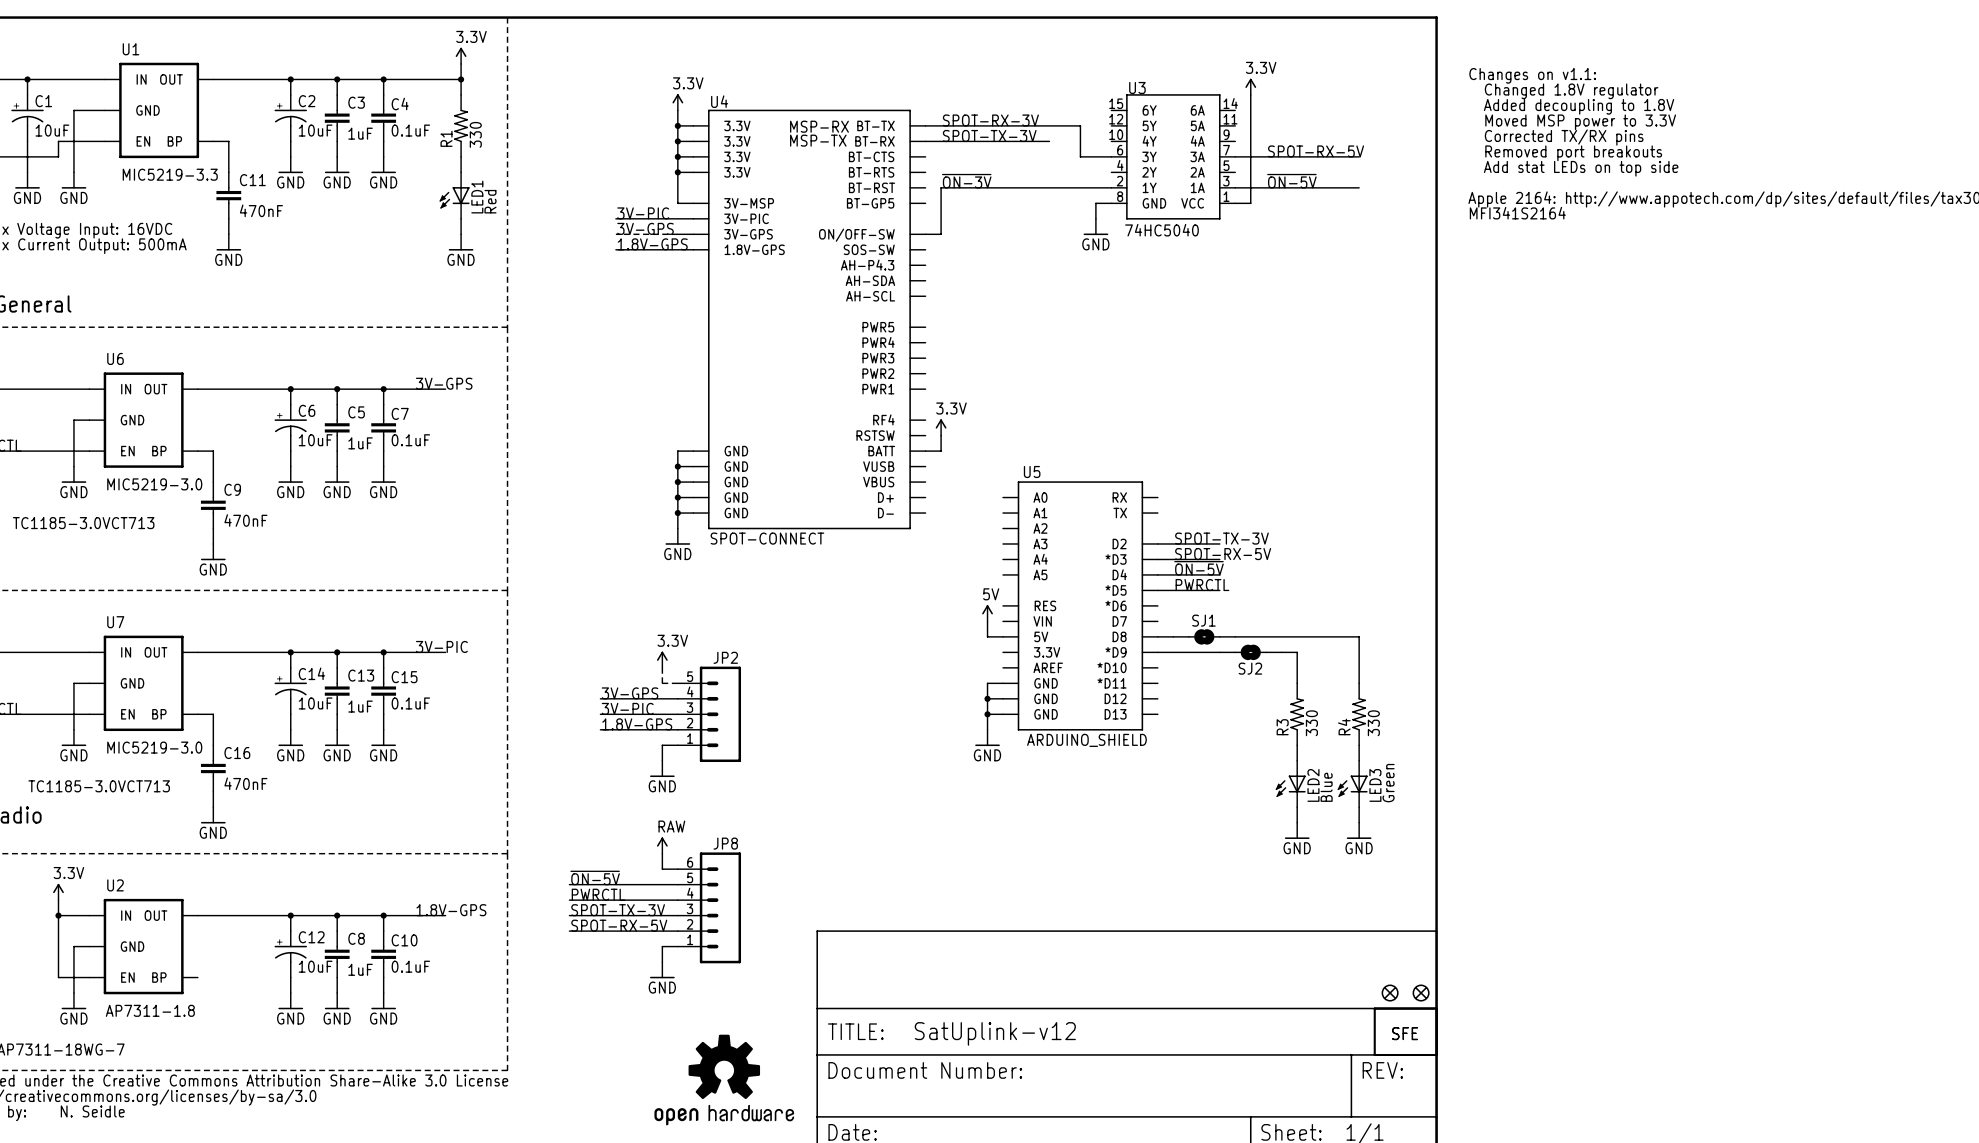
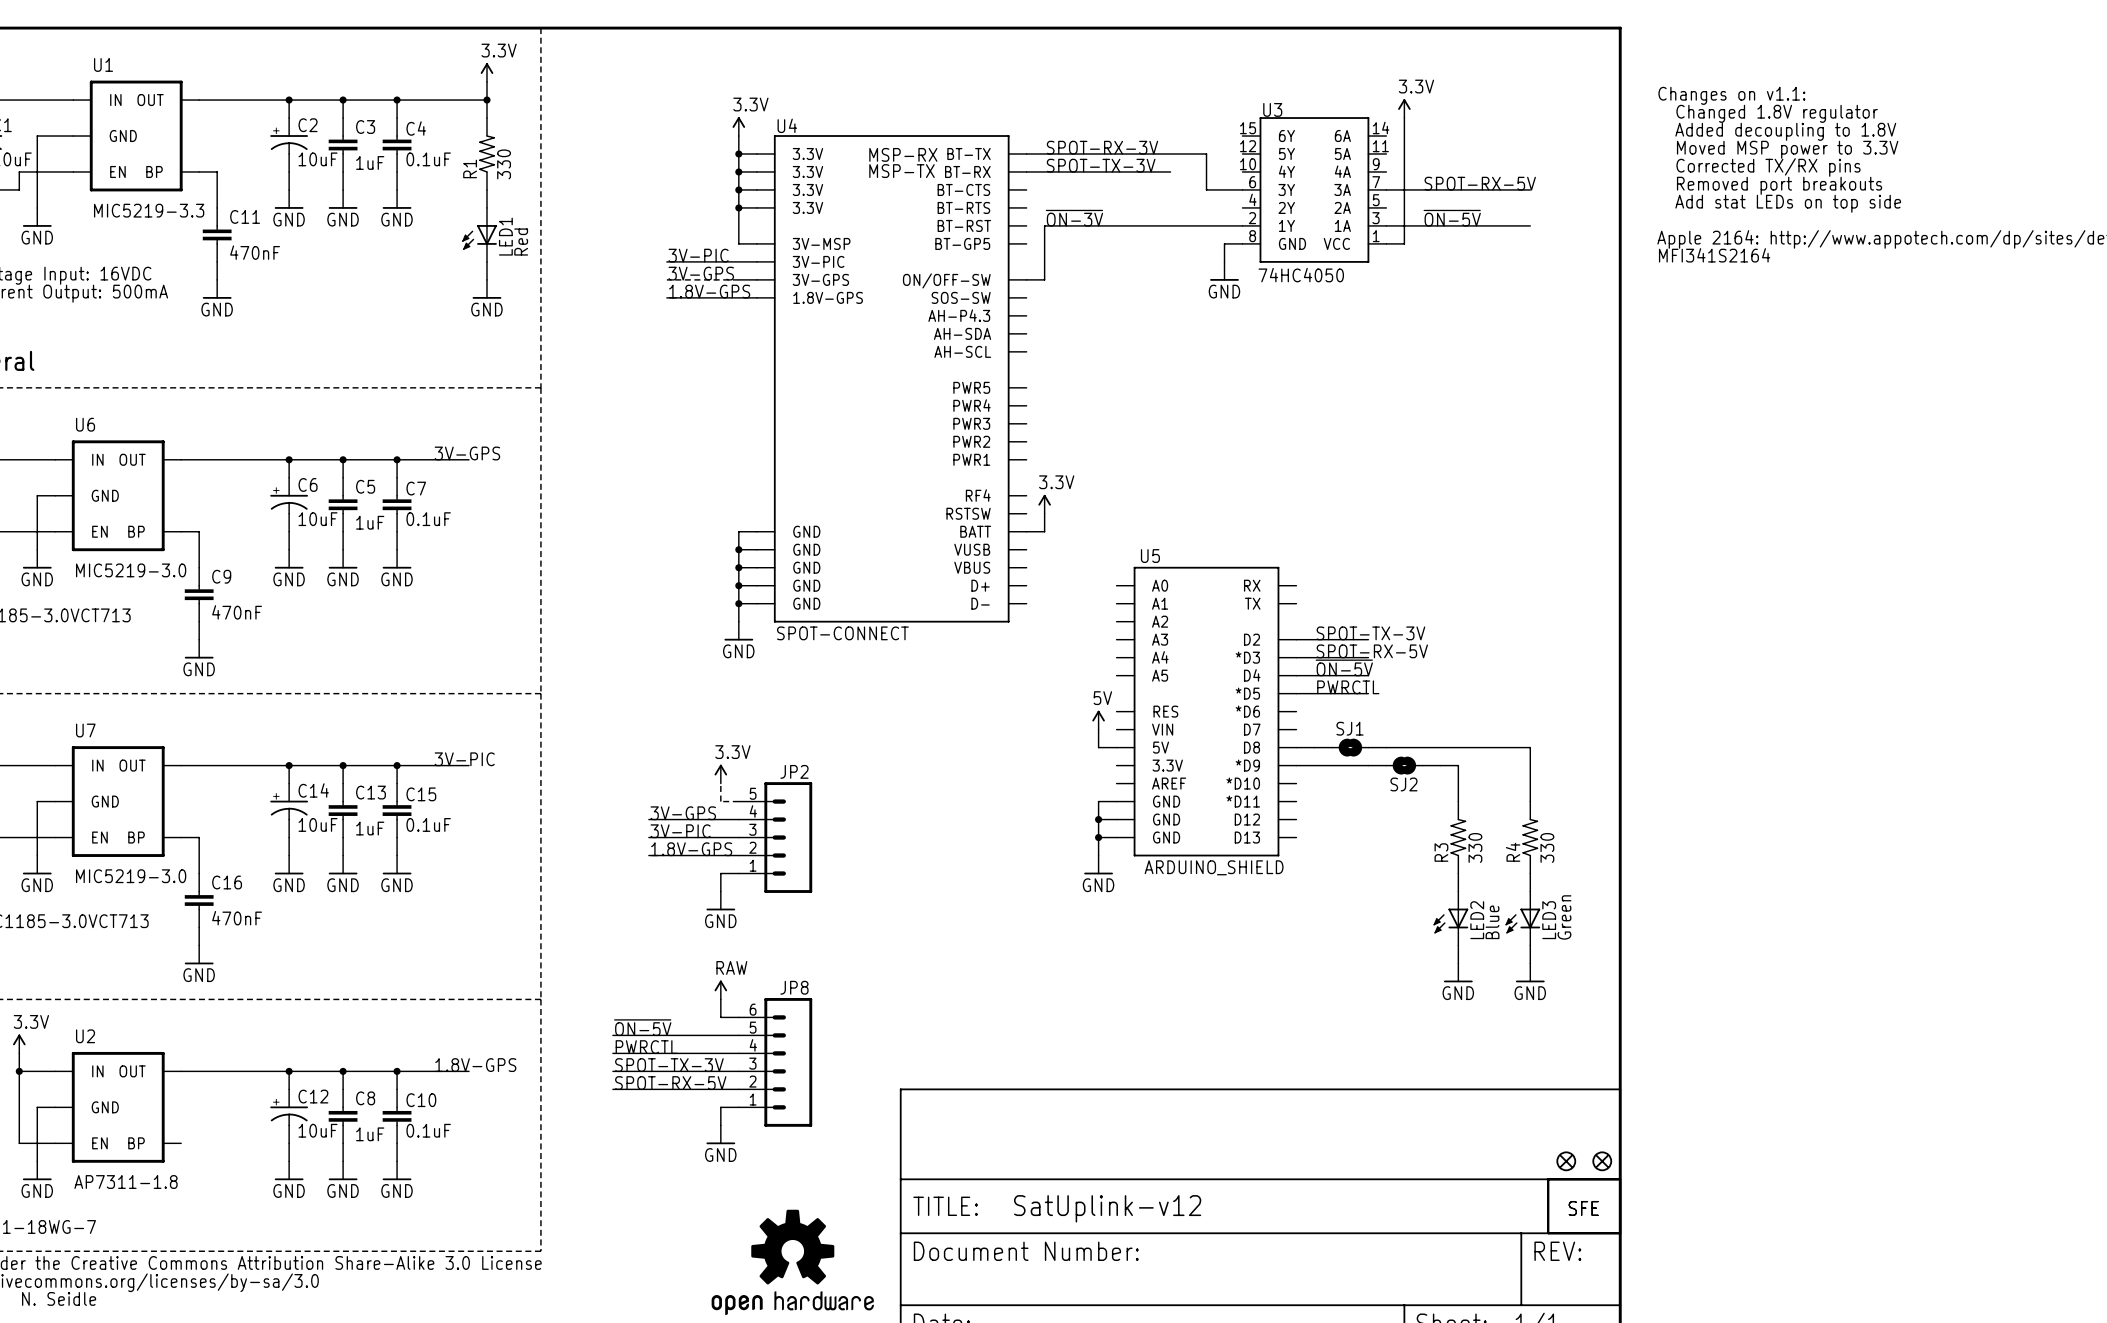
U3 value: 74HC5040 (1161, 230) -> 74HC4050 (1301, 275)

